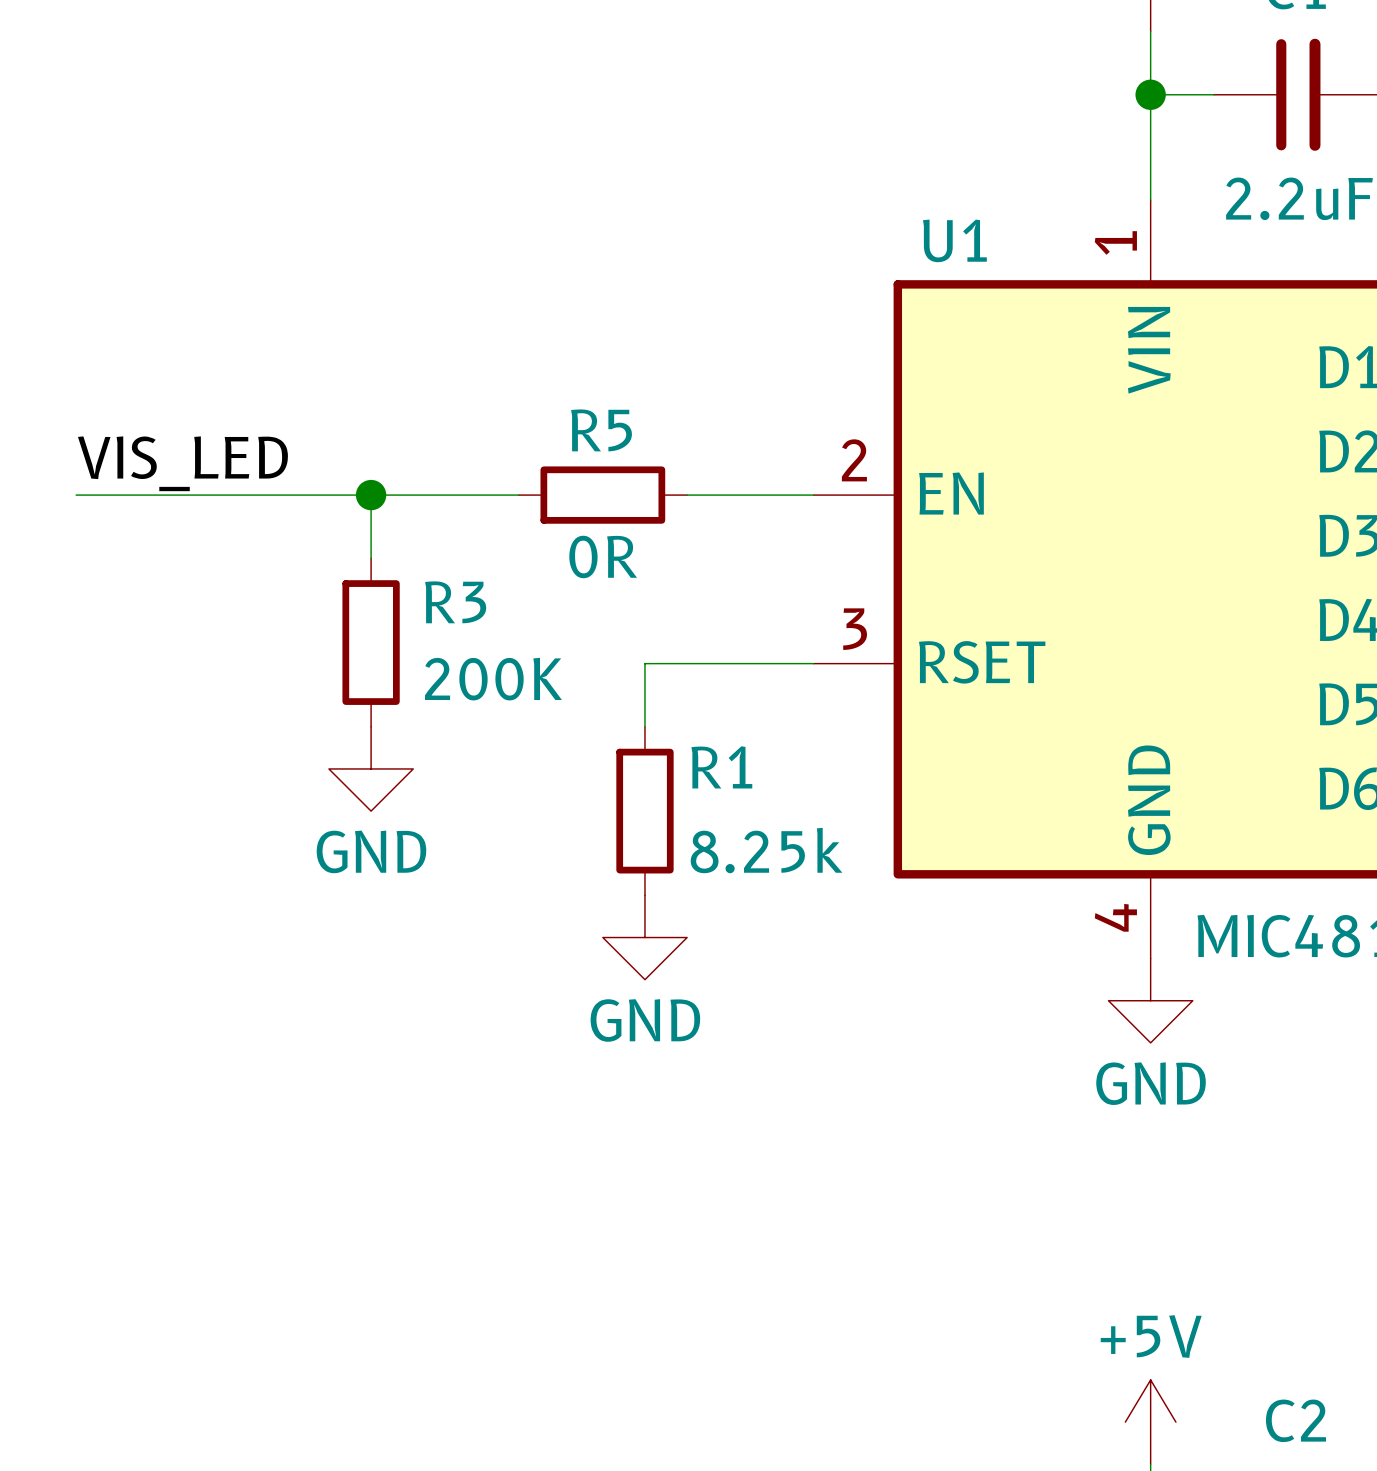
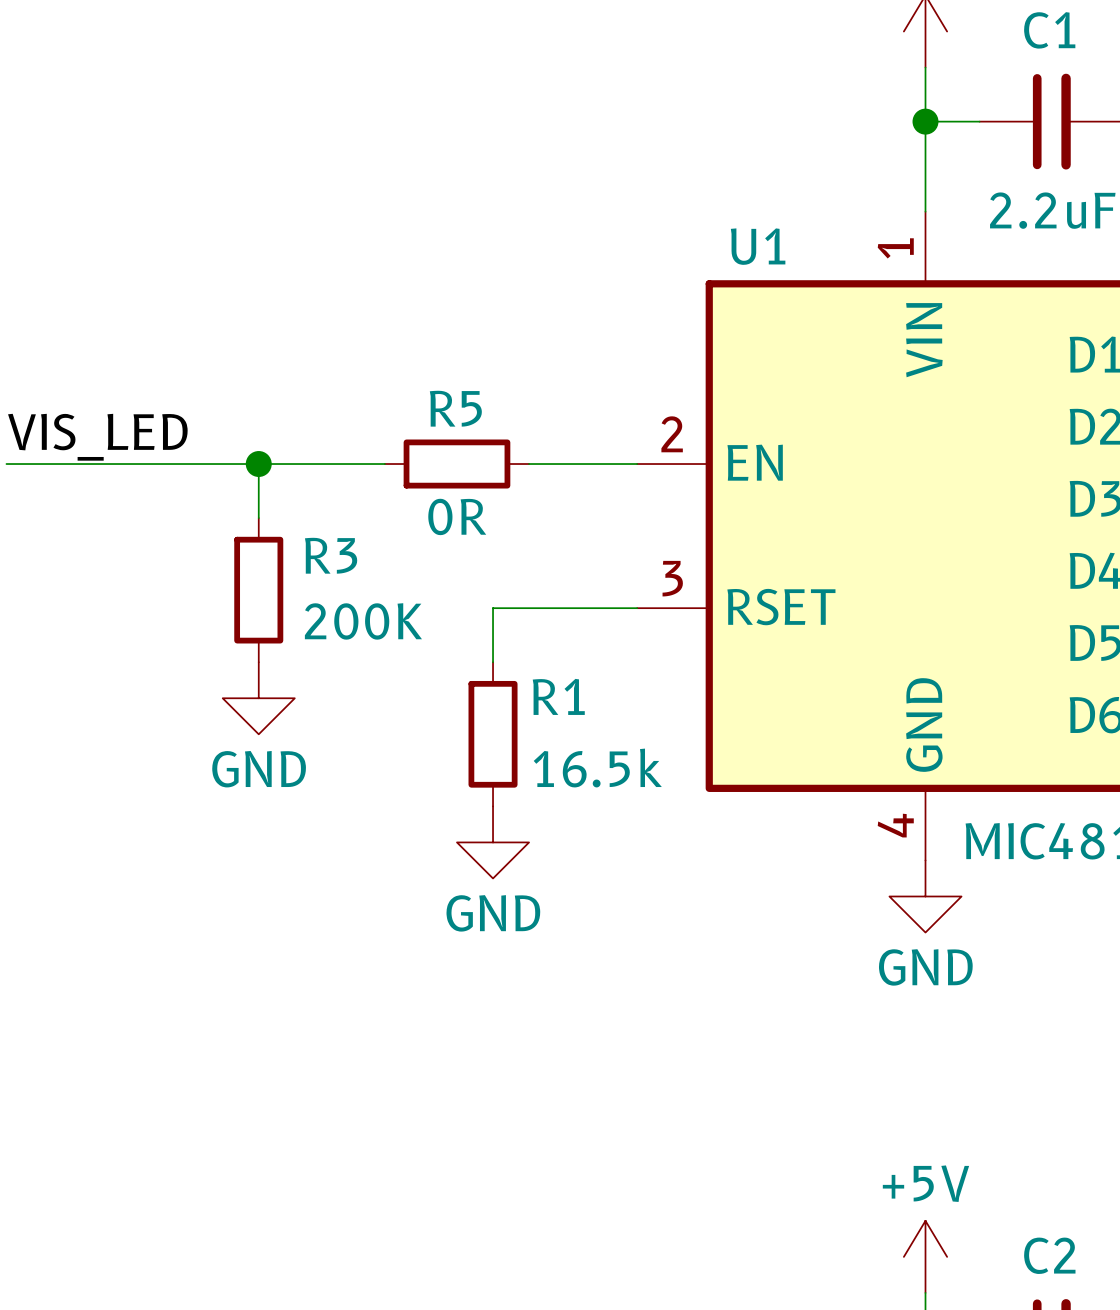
R1 value: 8.25k (766, 850) -> 16.5k (597, 768)

